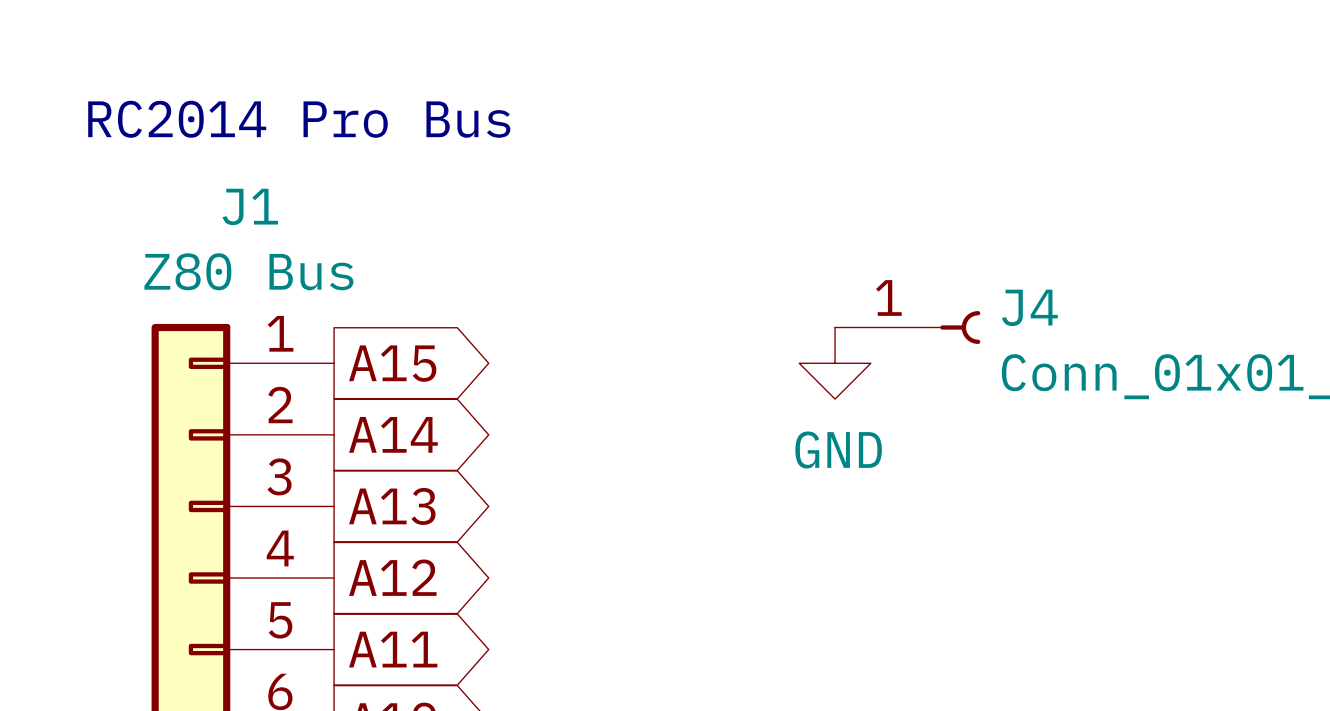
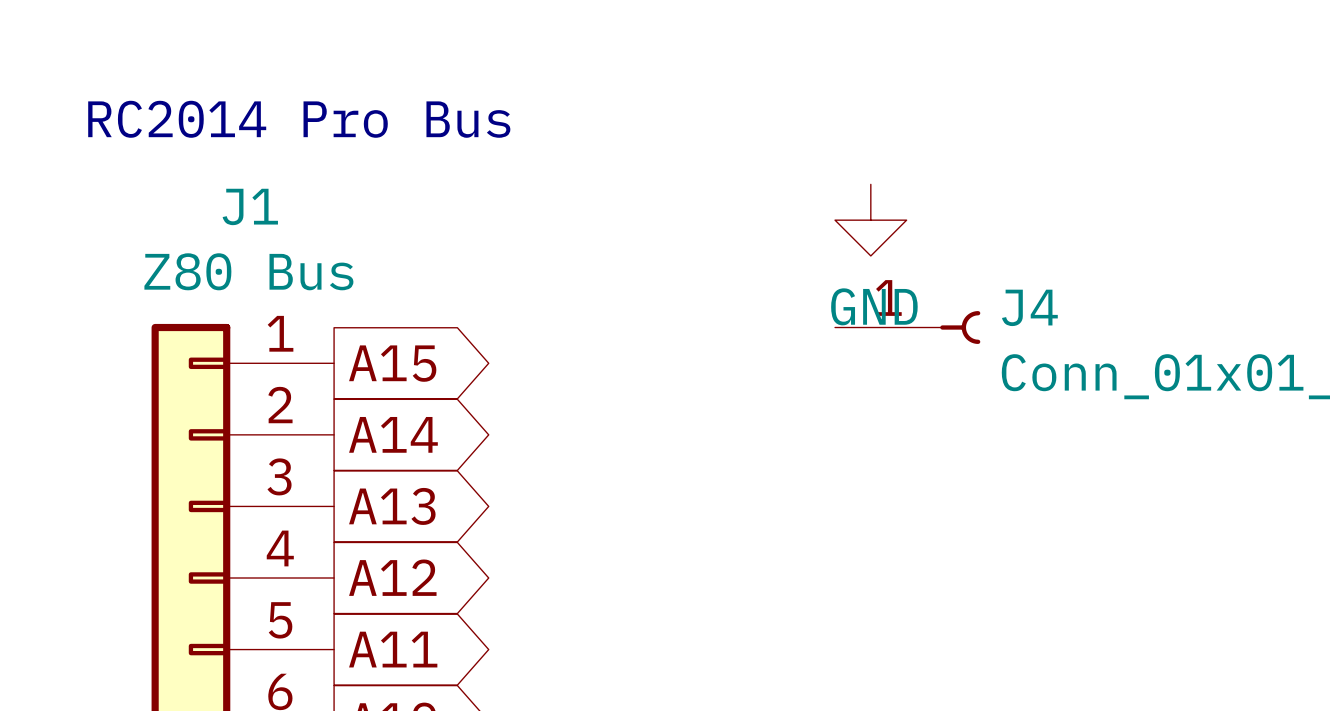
power symbol position: GND (835, 363) -> GND (870, 220)

